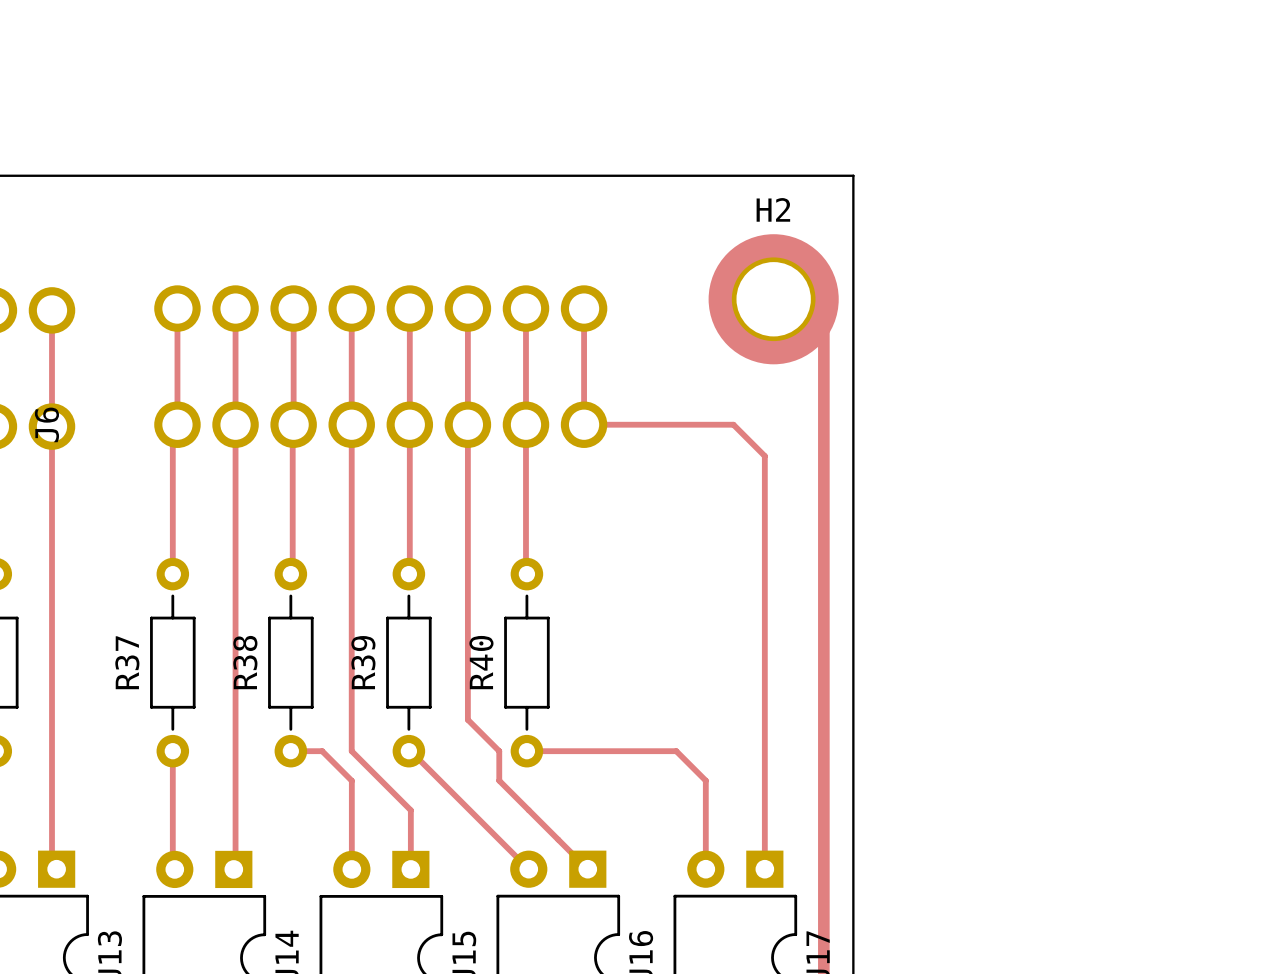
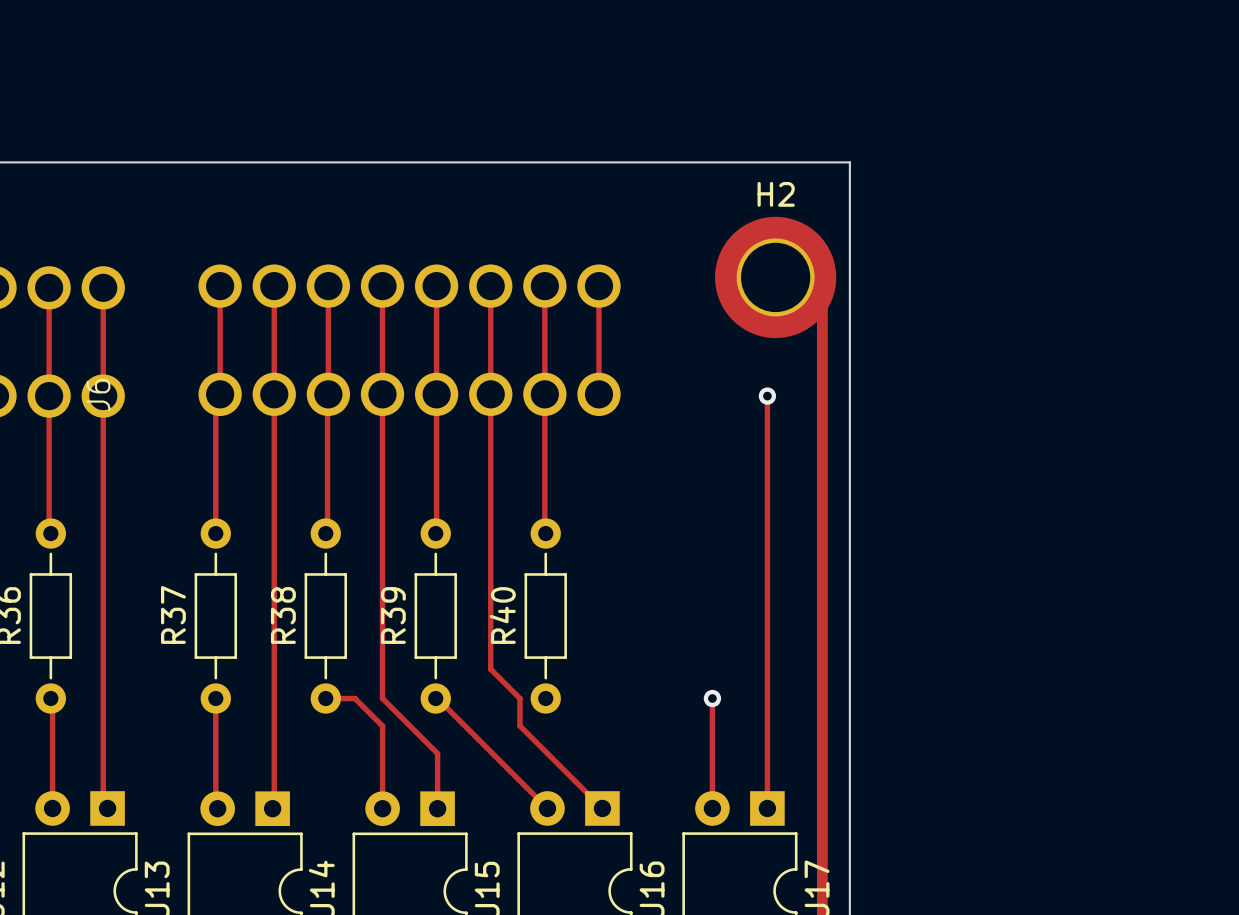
track: (584, 424) (733, 424) (764, 456) -> (767, 396) (767, 423)
via: none -> (767, 396)
track: (526, 751) (676, 751) (705, 780) -> (712, 698) (712, 726)
via: none -> (712, 698)

